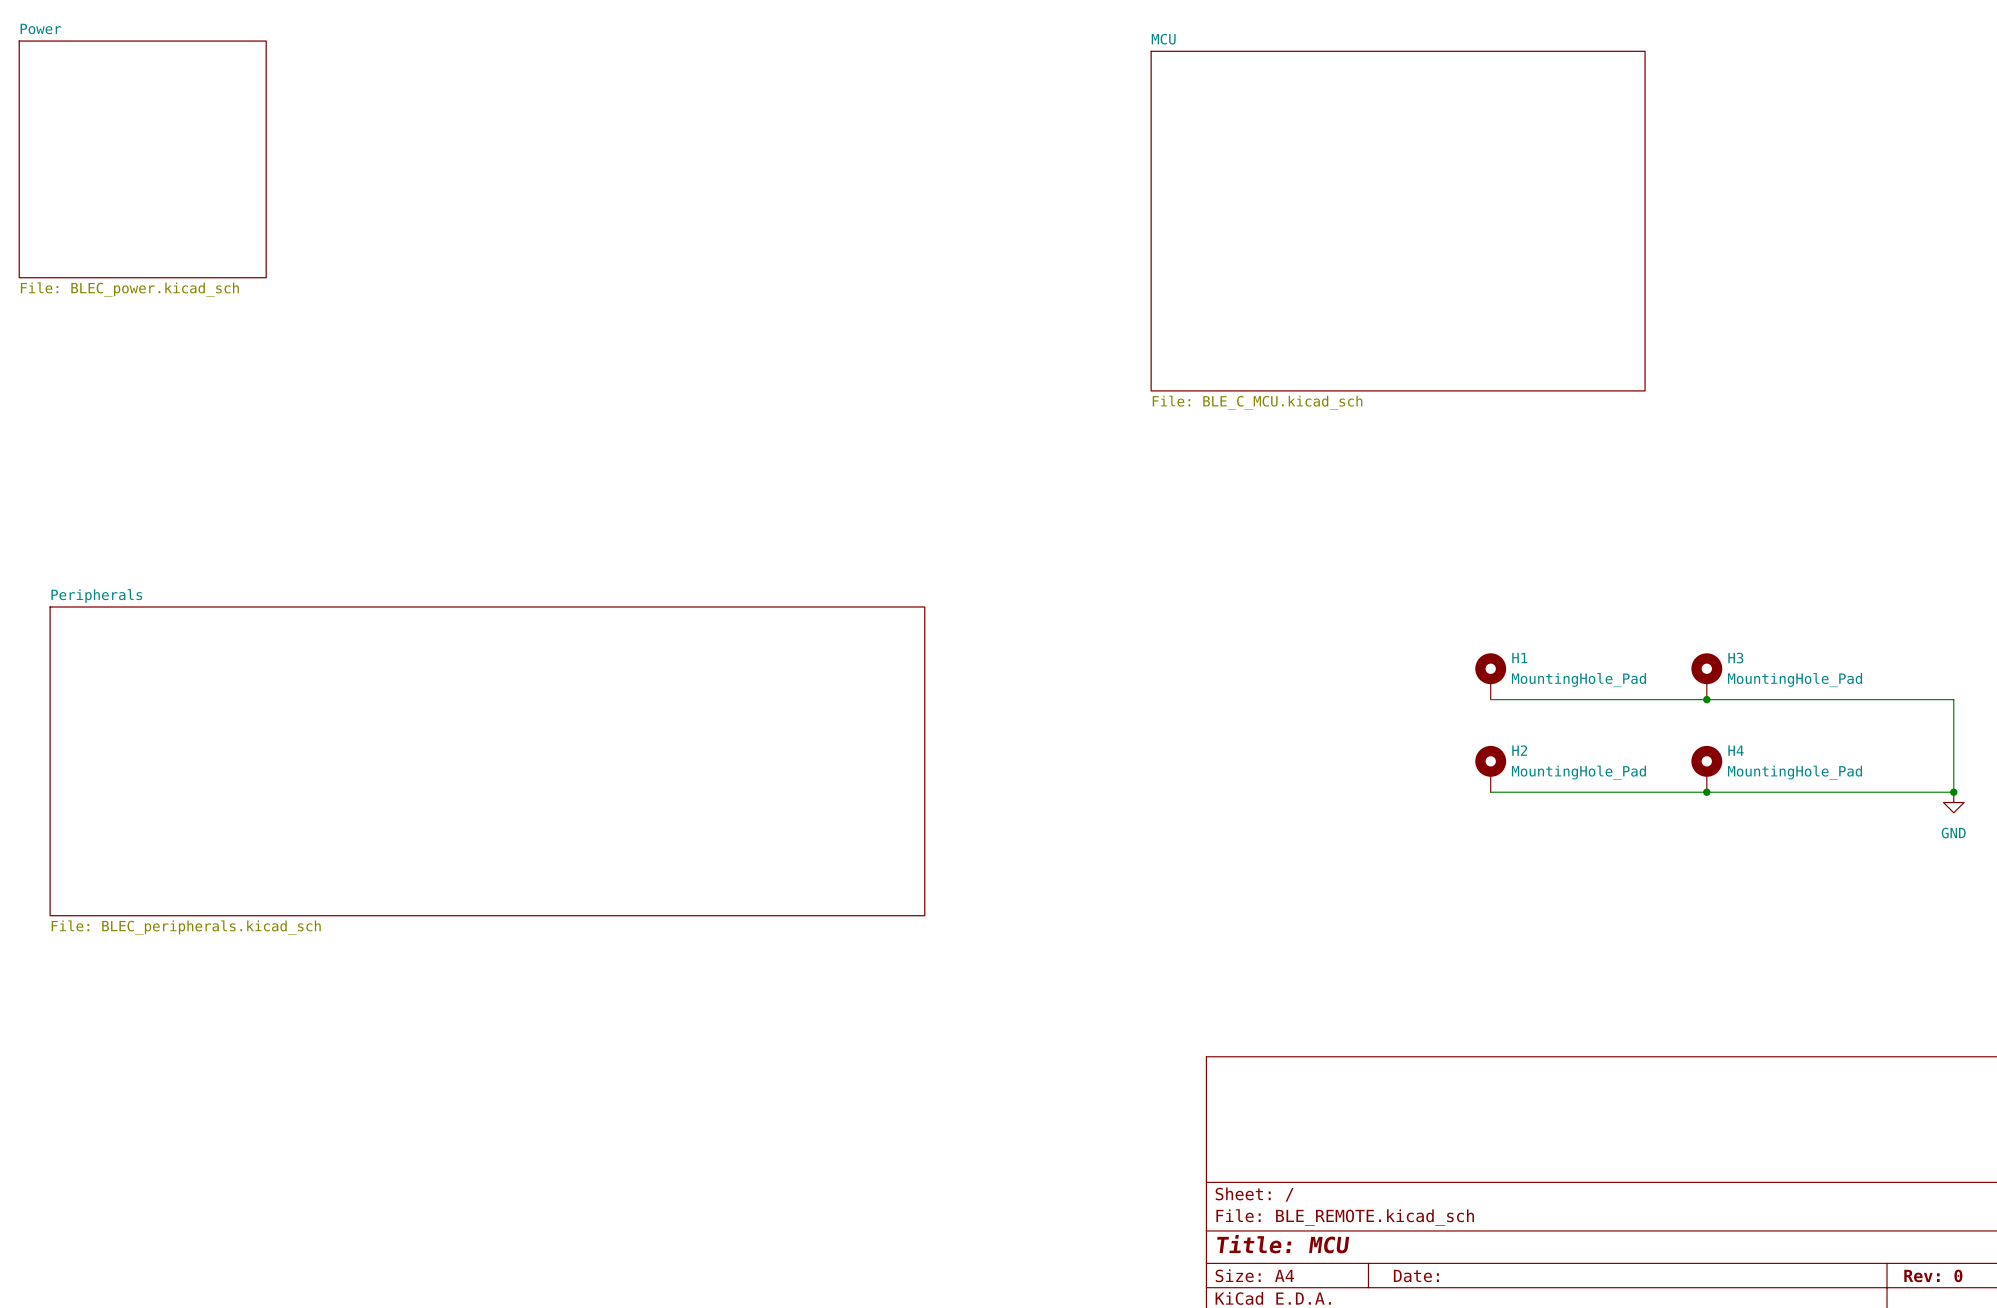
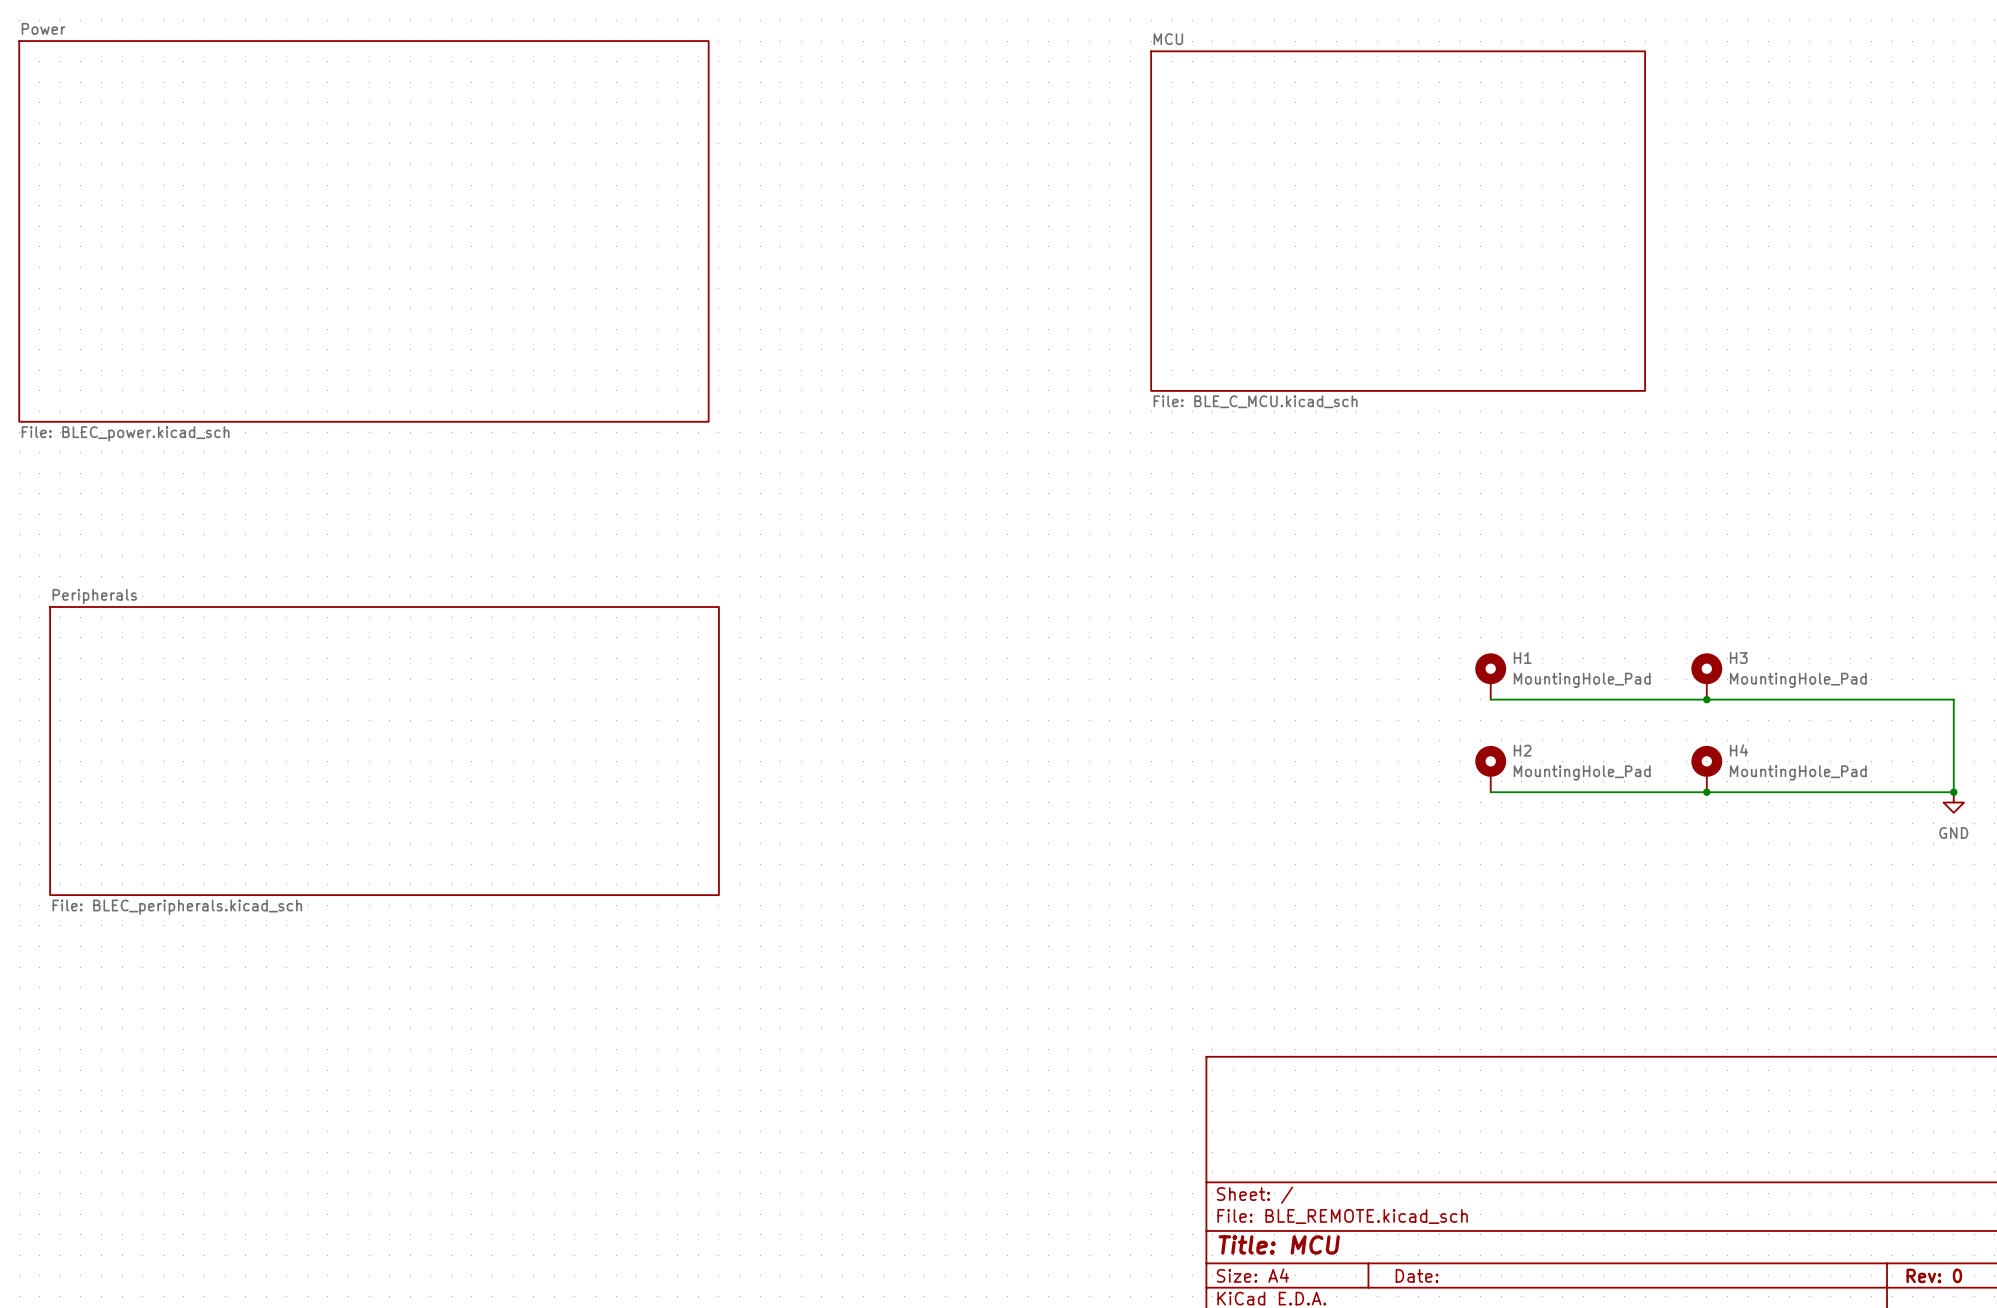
sheet Power: File: BLEC_power.kicad_sch (142, 159) -> none
sheet Power: none -> File: BLEC_power.kicad_sch (363, 231)
sheet Peripherals: none -> File: BLEC_peripherals.kicad_sch (384, 751)
sheet Peripherals: File: BLEC_peripherals.kicad_sch (487, 761) -> none

